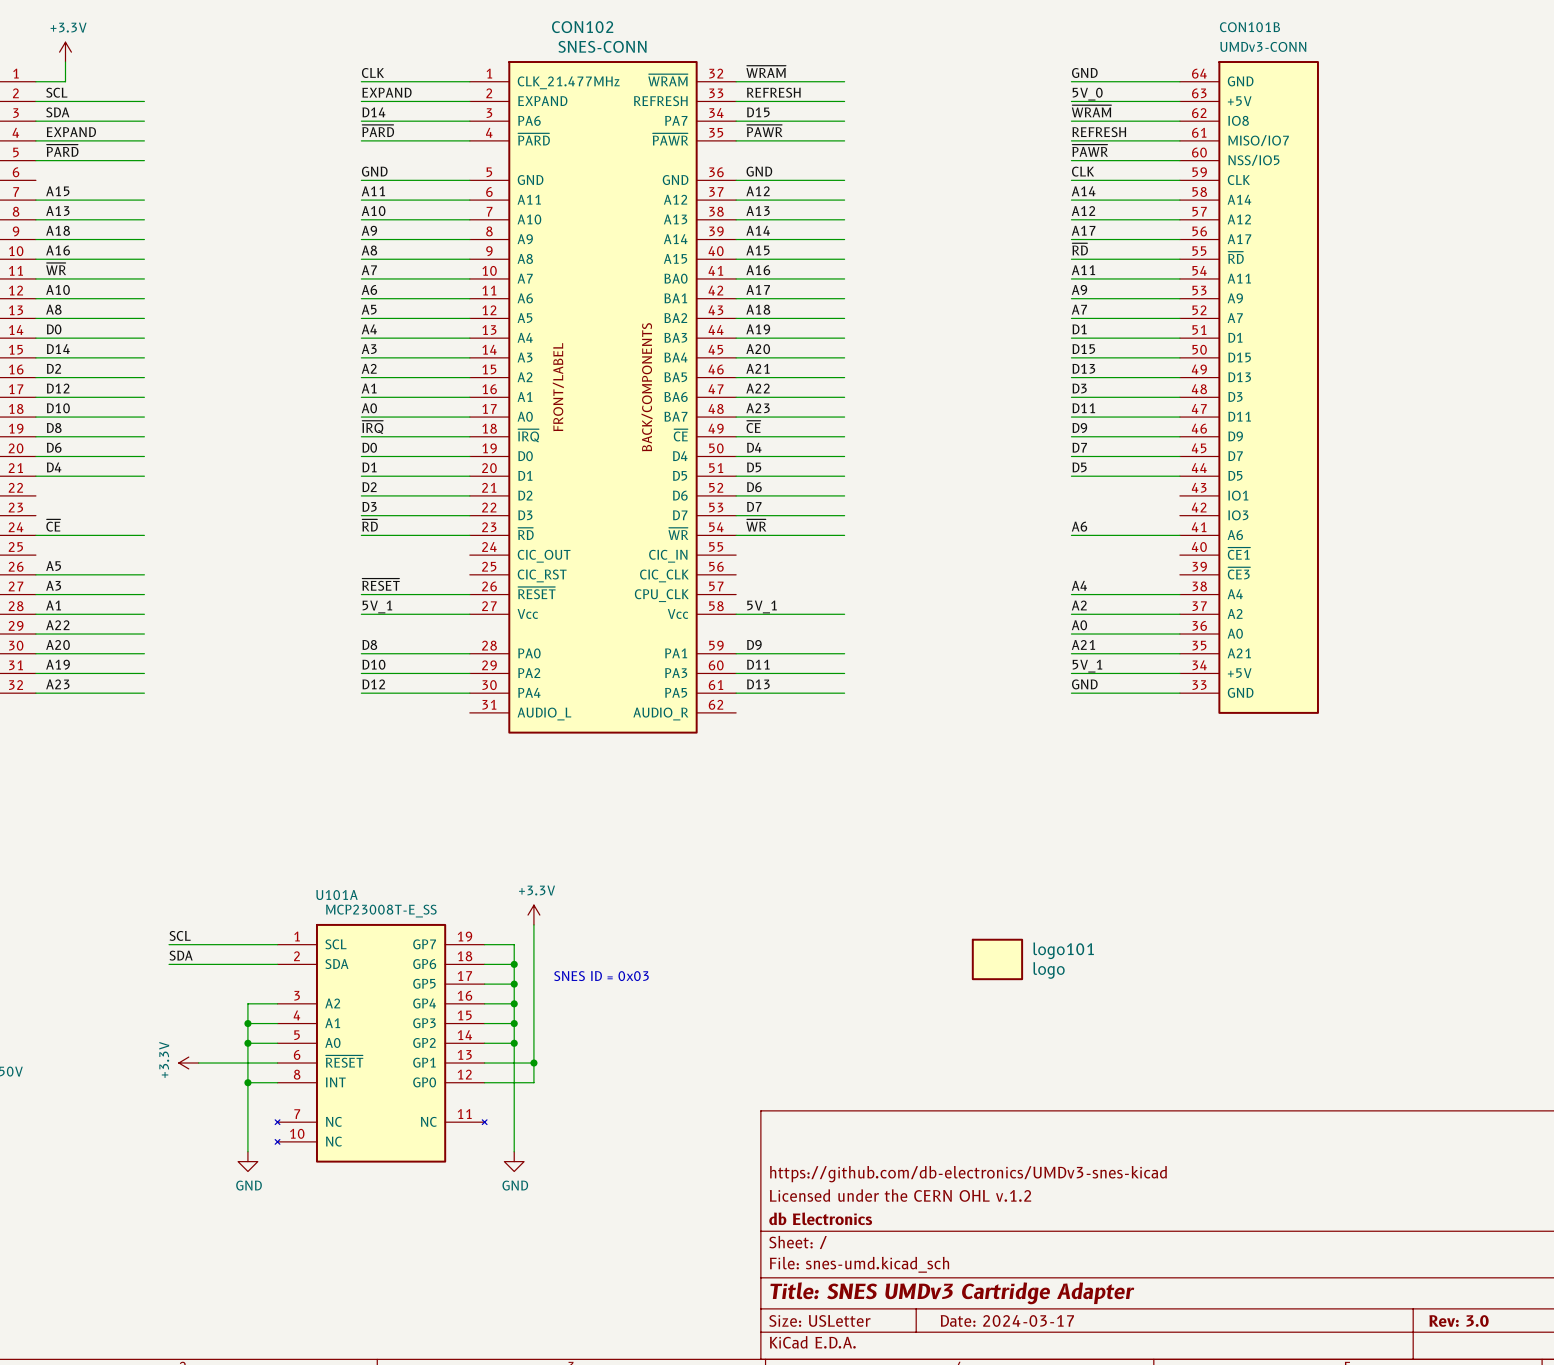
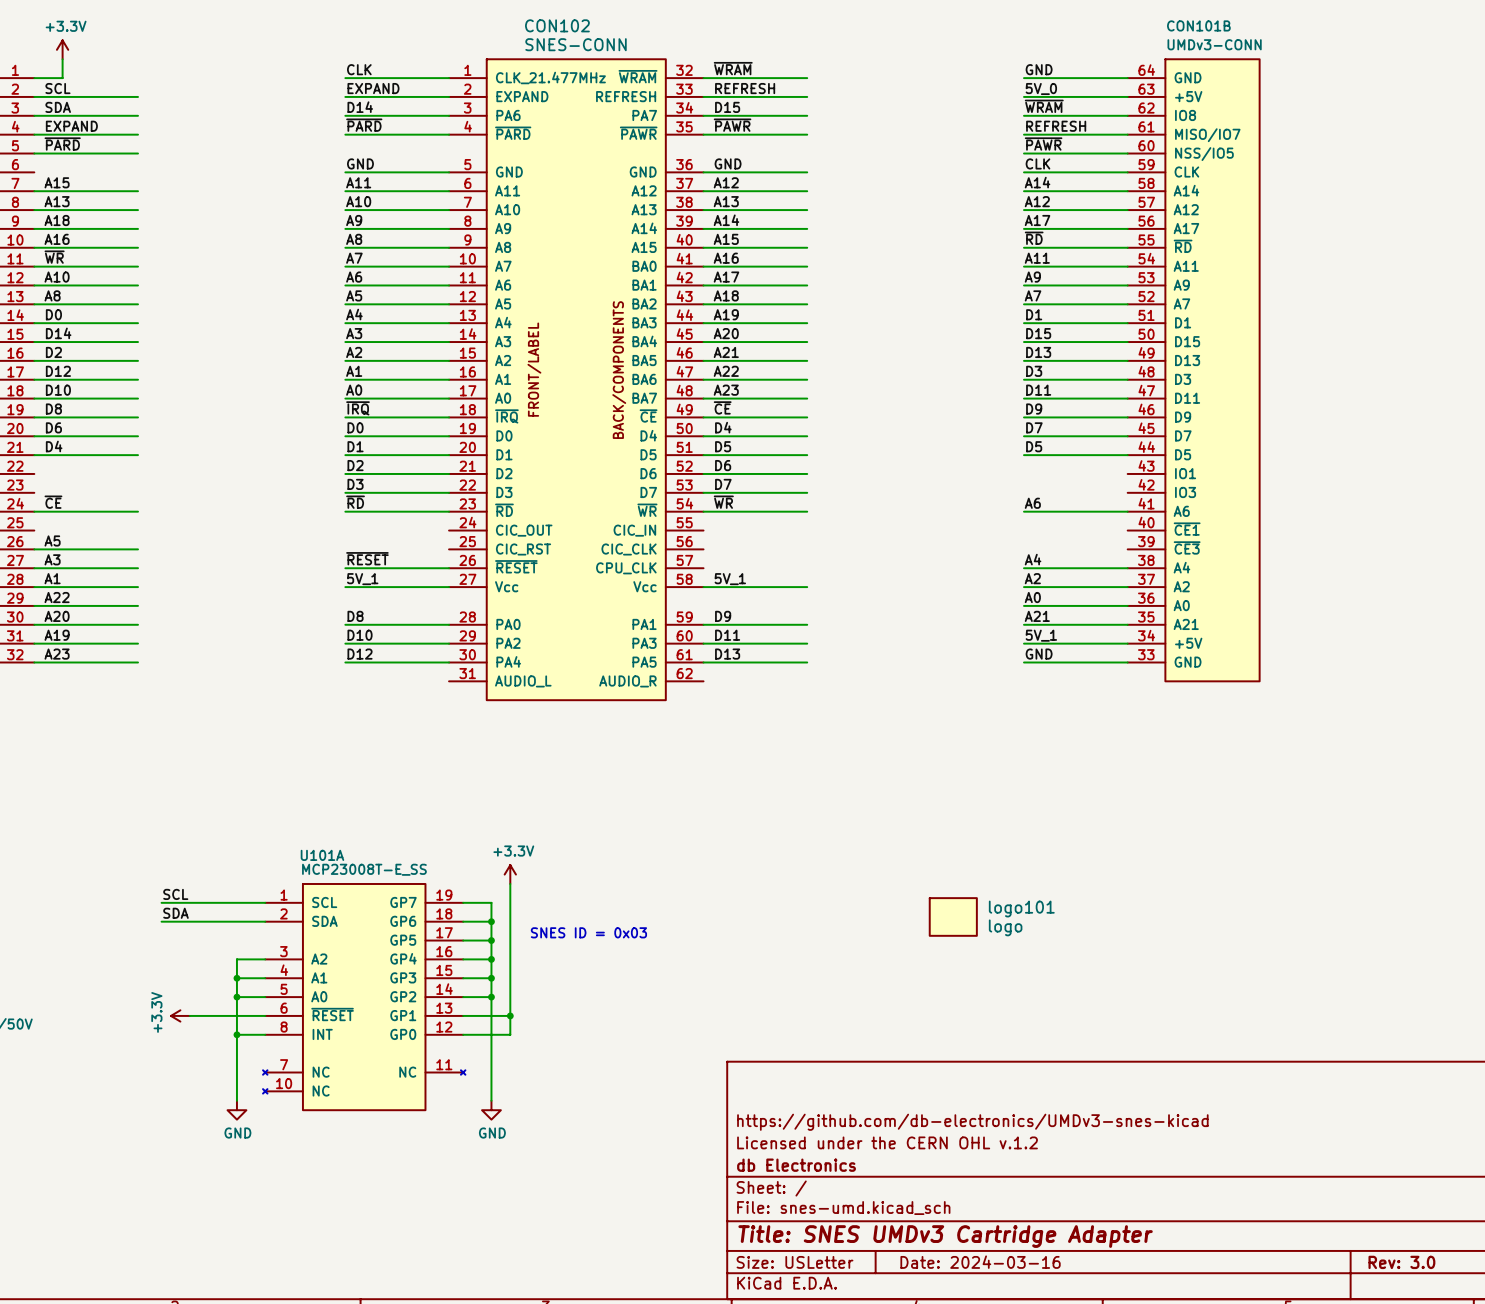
title block: Date: 2024-03-17 (1007, 1320) -> Date: 2024-03-16 (980, 1262)

